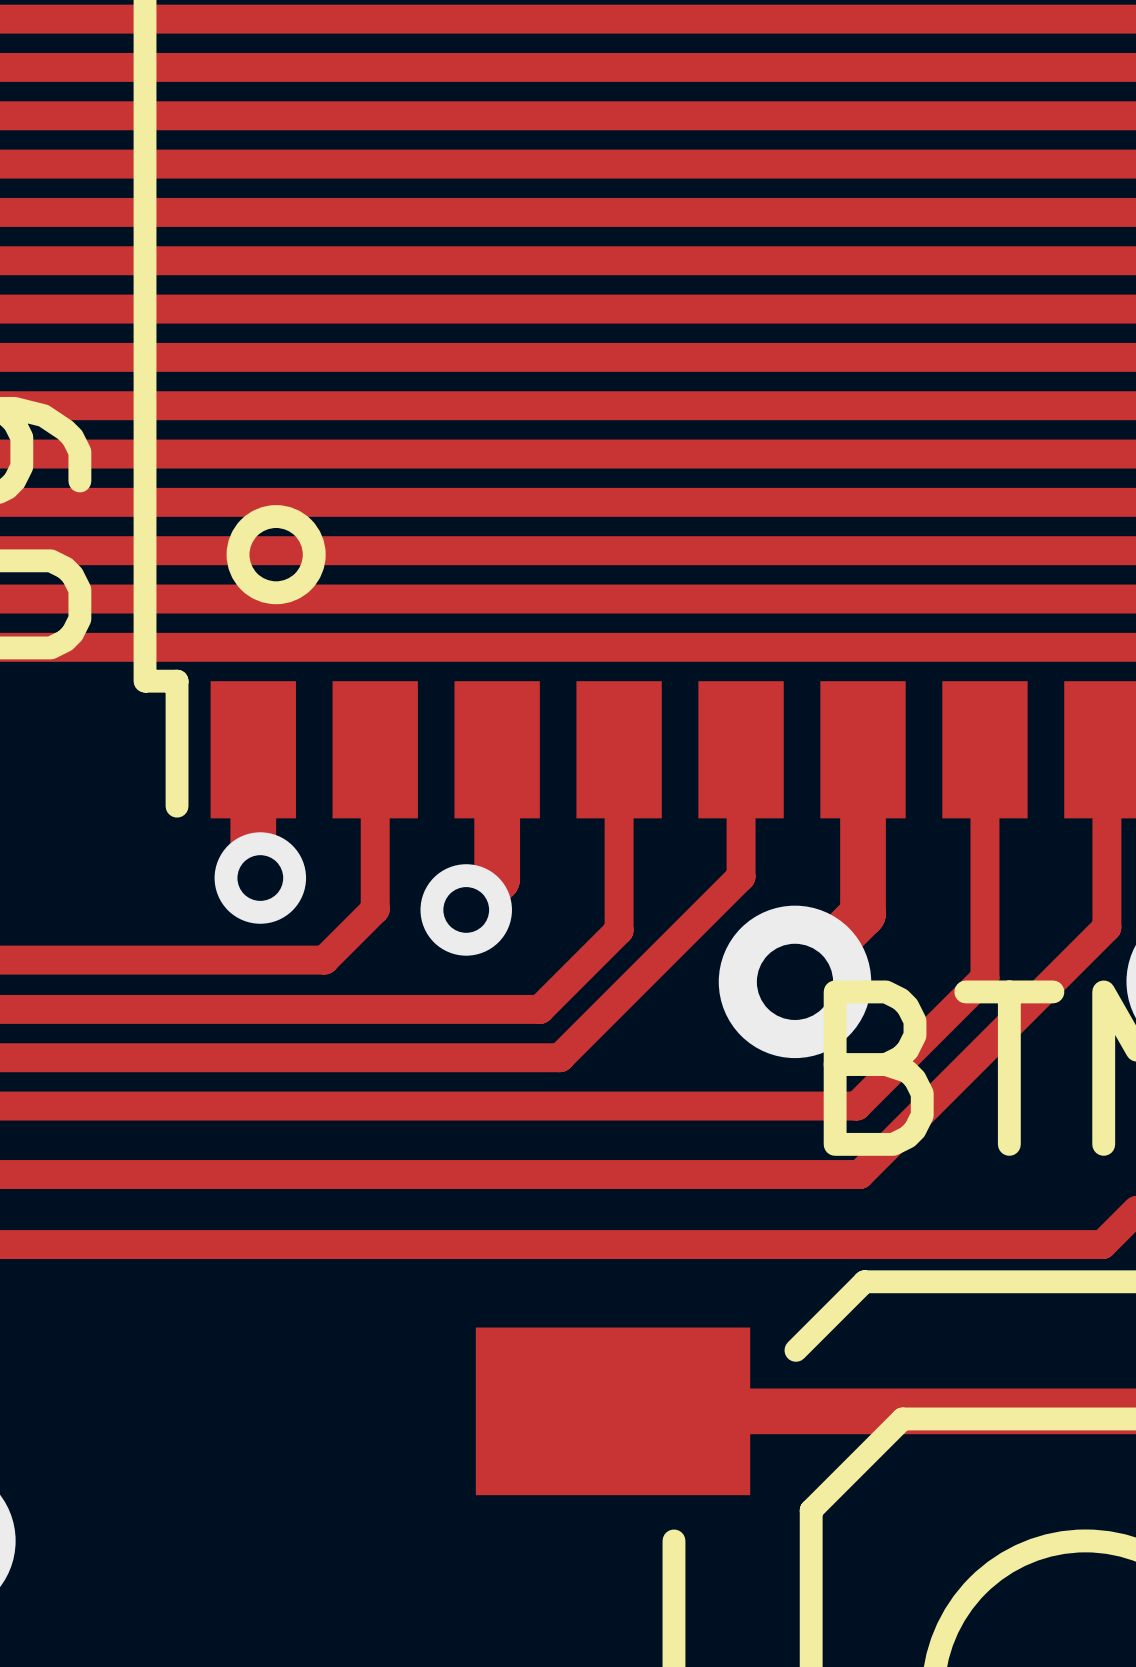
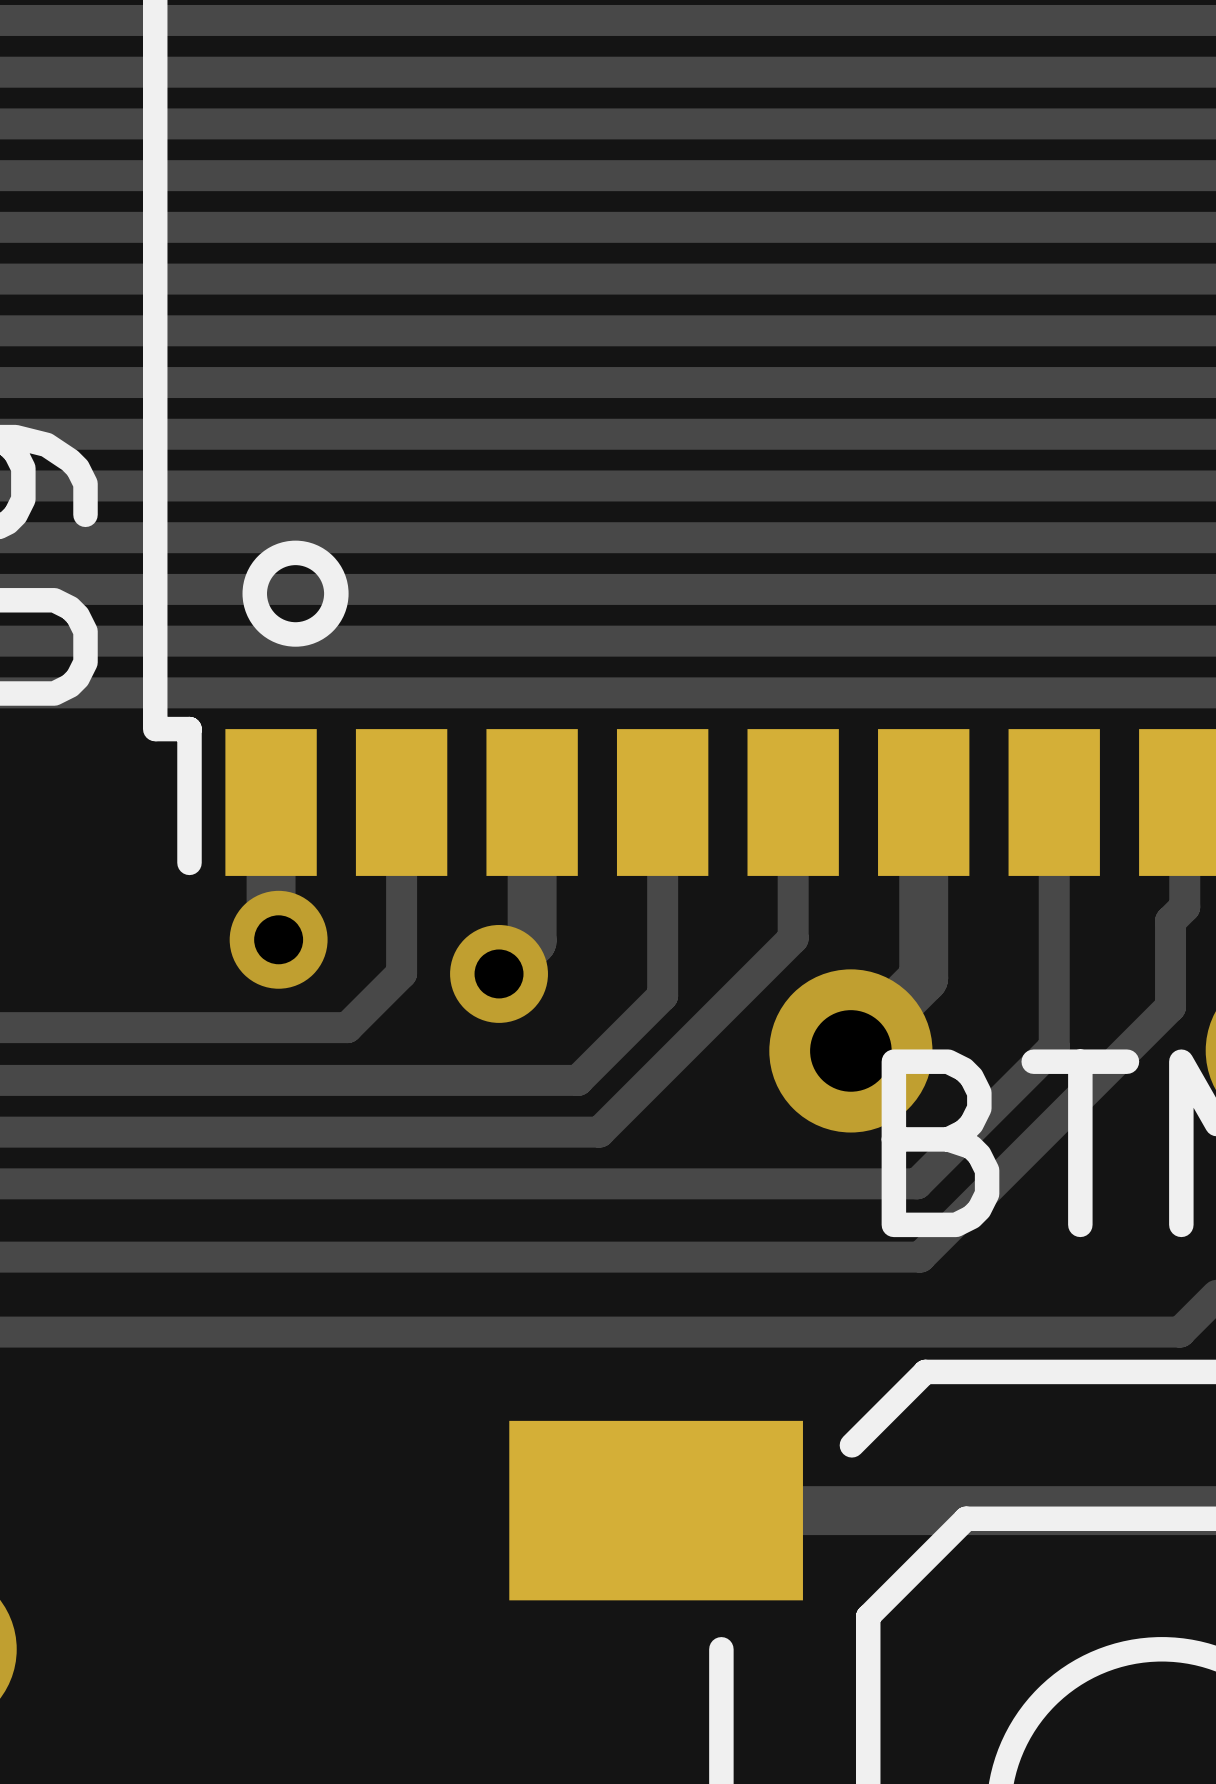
track: (1106, 847) (1106, 927) (1093, 940) -> (1184, 906) (1170, 921) (1170, 1006)

